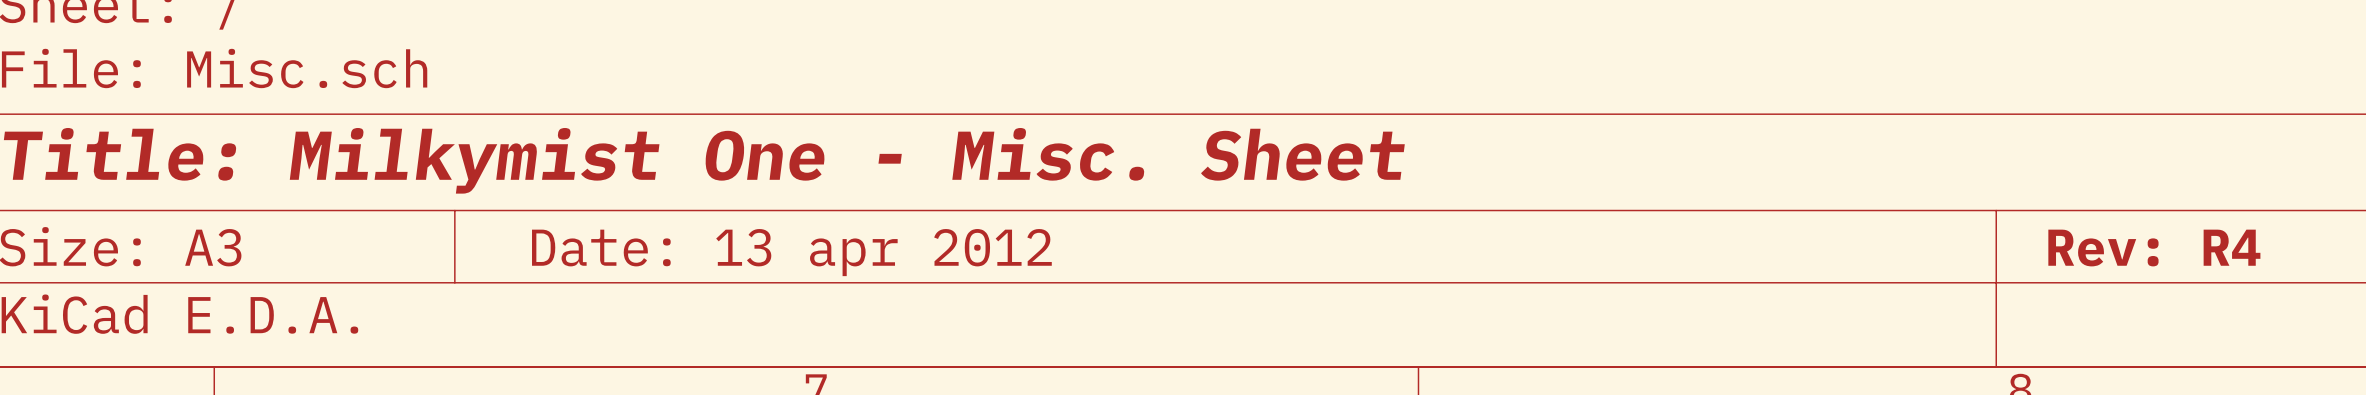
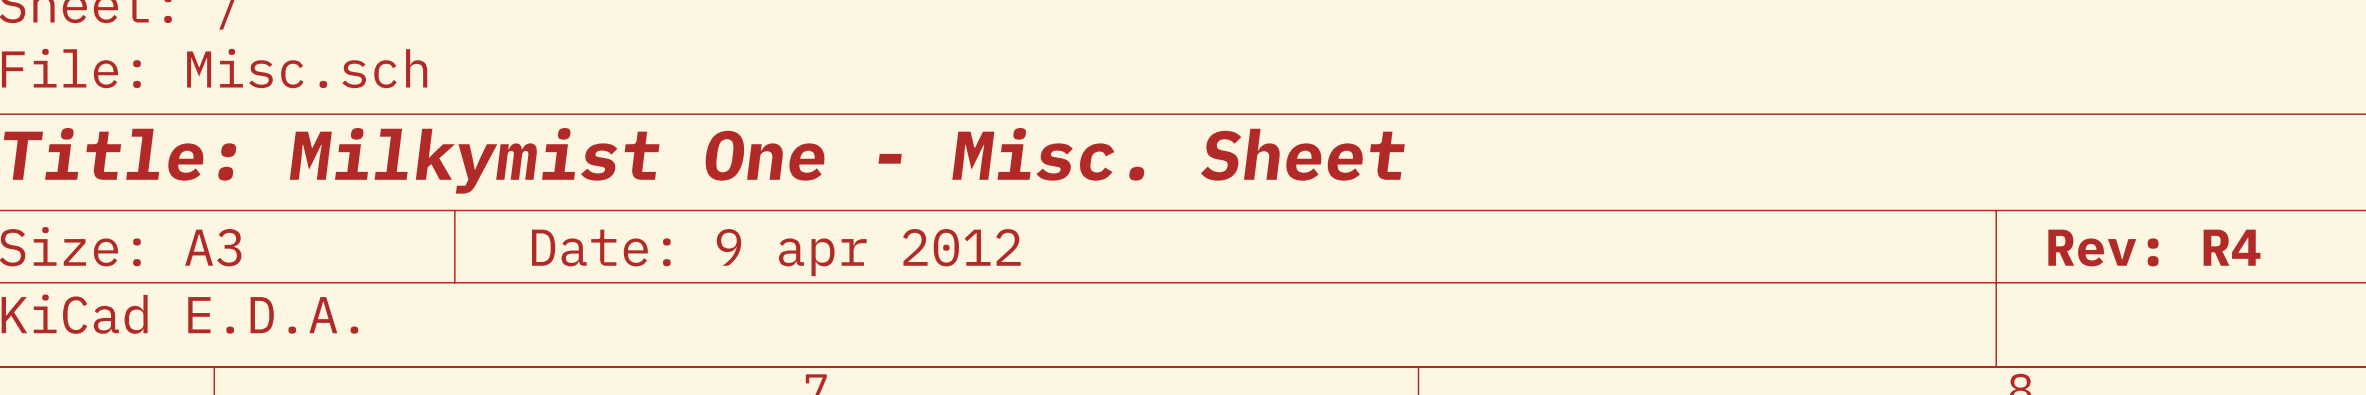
title block: Date: 13 apr 2012 (791, 252) -> Date: 9 apr 2012 (776, 252)

